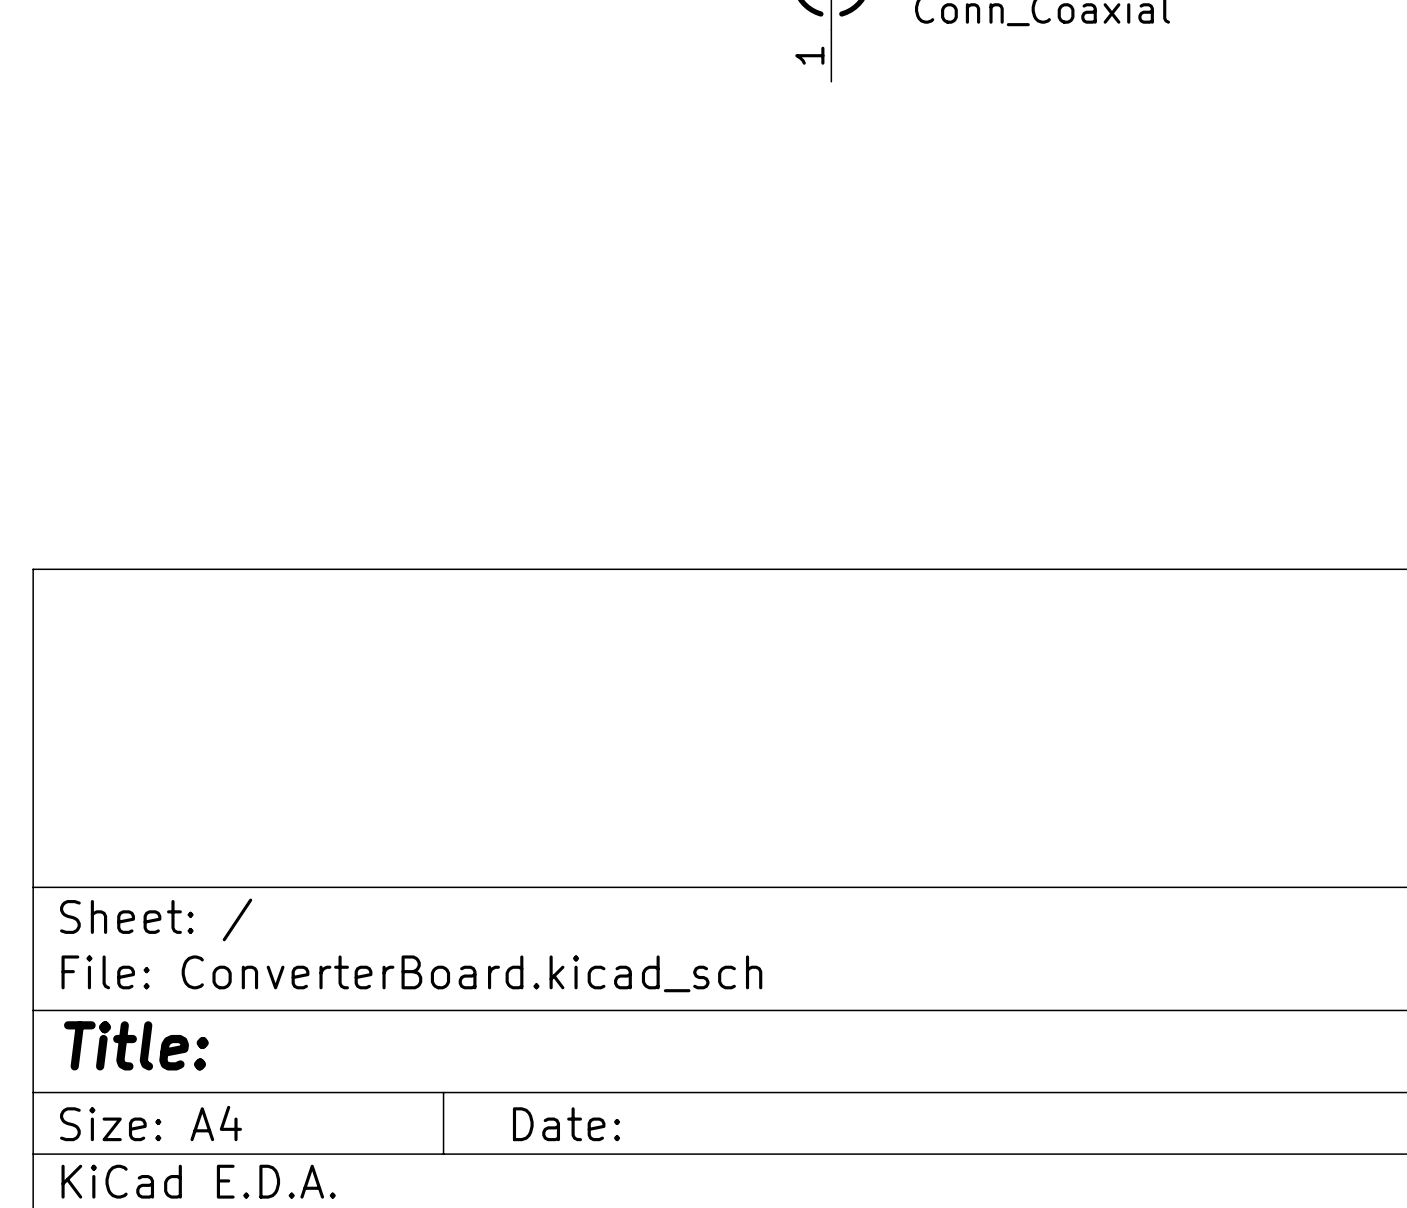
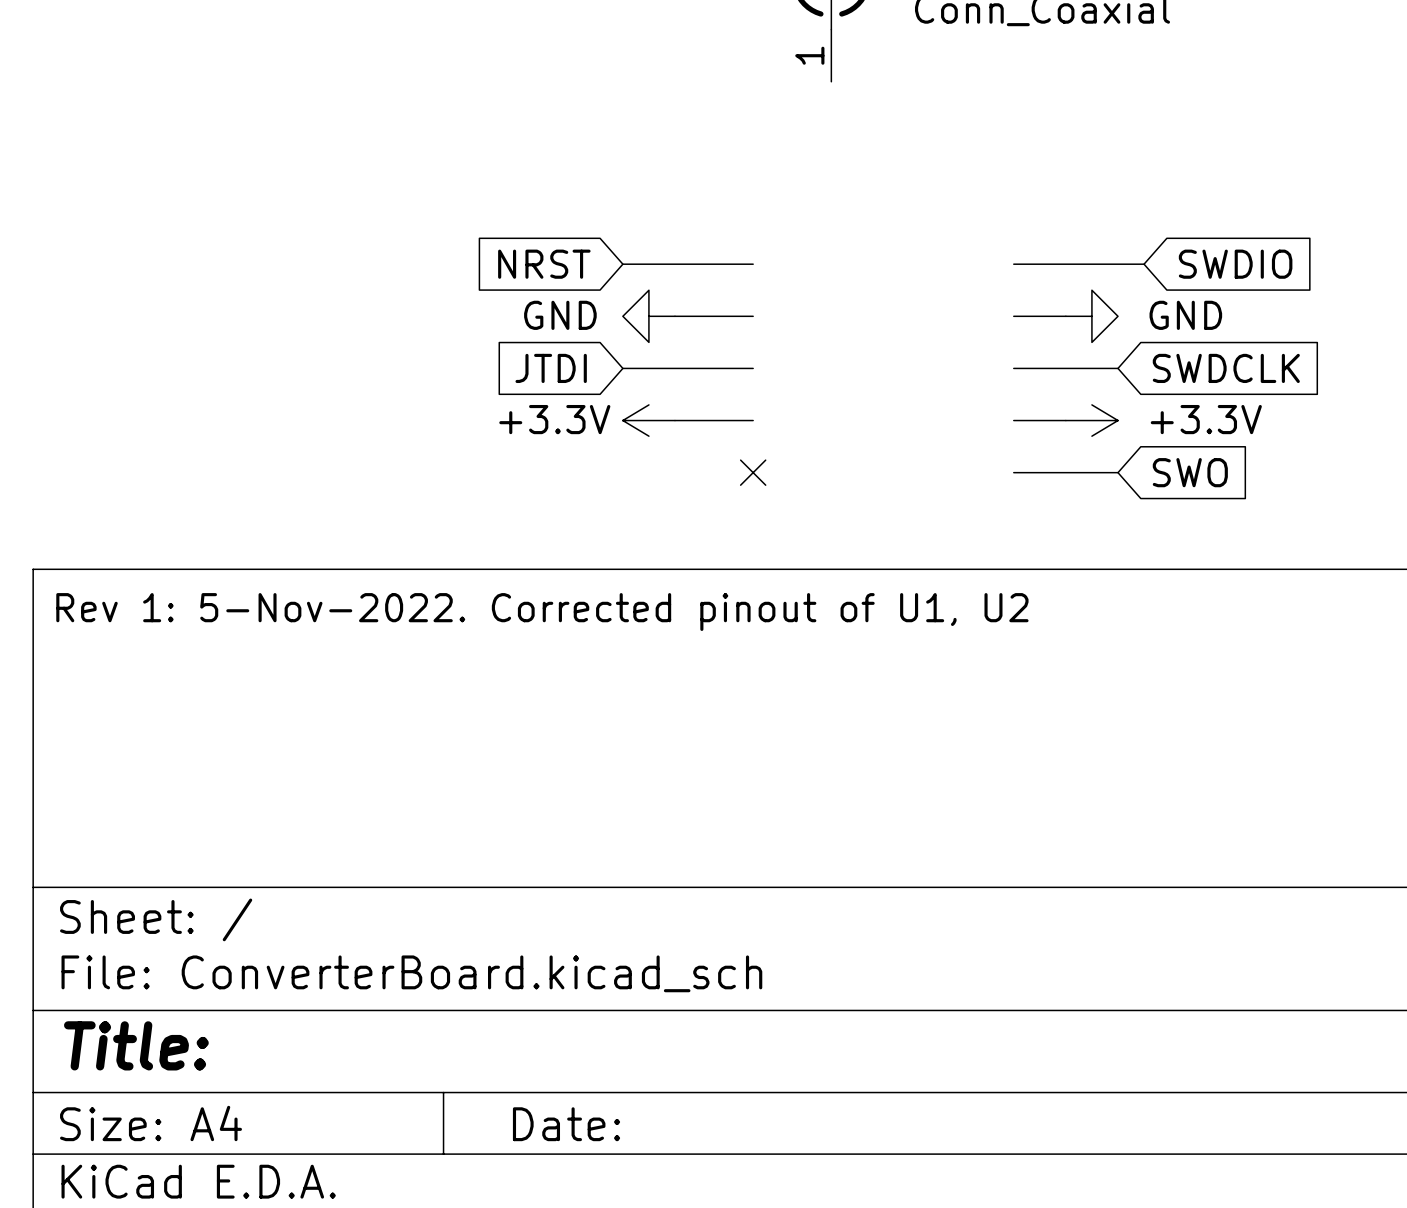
global label: none -> NRST (544, 264)
wire: none -> (622, 264) (753, 264)
wire: none -> (1013, 264) (1144, 264)
global label: none -> SWDIO (1235, 264)
power symbol: none -> GND (648, 316)
wire: none -> (674, 316) (753, 316)
wire: none -> (1013, 316) (1065, 316)
power symbol: none -> GND (1091, 316)
global label: none -> JTDI (551, 368)
wire: none -> (622, 368) (753, 368)
wire: none -> (1013, 368) (1118, 368)
global label: none -> SWDCLK (1226, 368)
power symbol: none -> +3.3V (648, 420)
wire: none -> (674, 420) (753, 420)
wire: none -> (1013, 420) (1065, 420)
power symbol: none -> +3.3V (1091, 420)
no-connect mark: none -> (753, 472)
wire: none -> (1013, 472) (1118, 472)
global label: none -> SWO (1190, 472)
text: none -> Rev 1: 5-Nov-2022. Corrected pinout of U1, U2 (542, 612)

